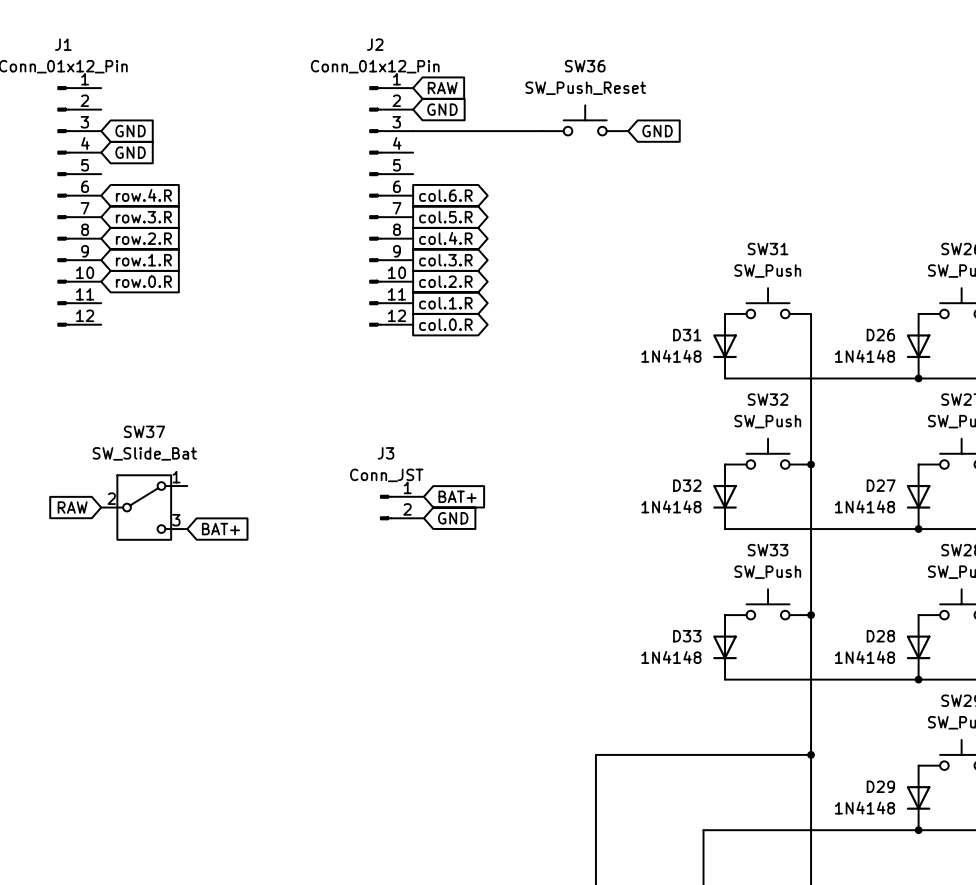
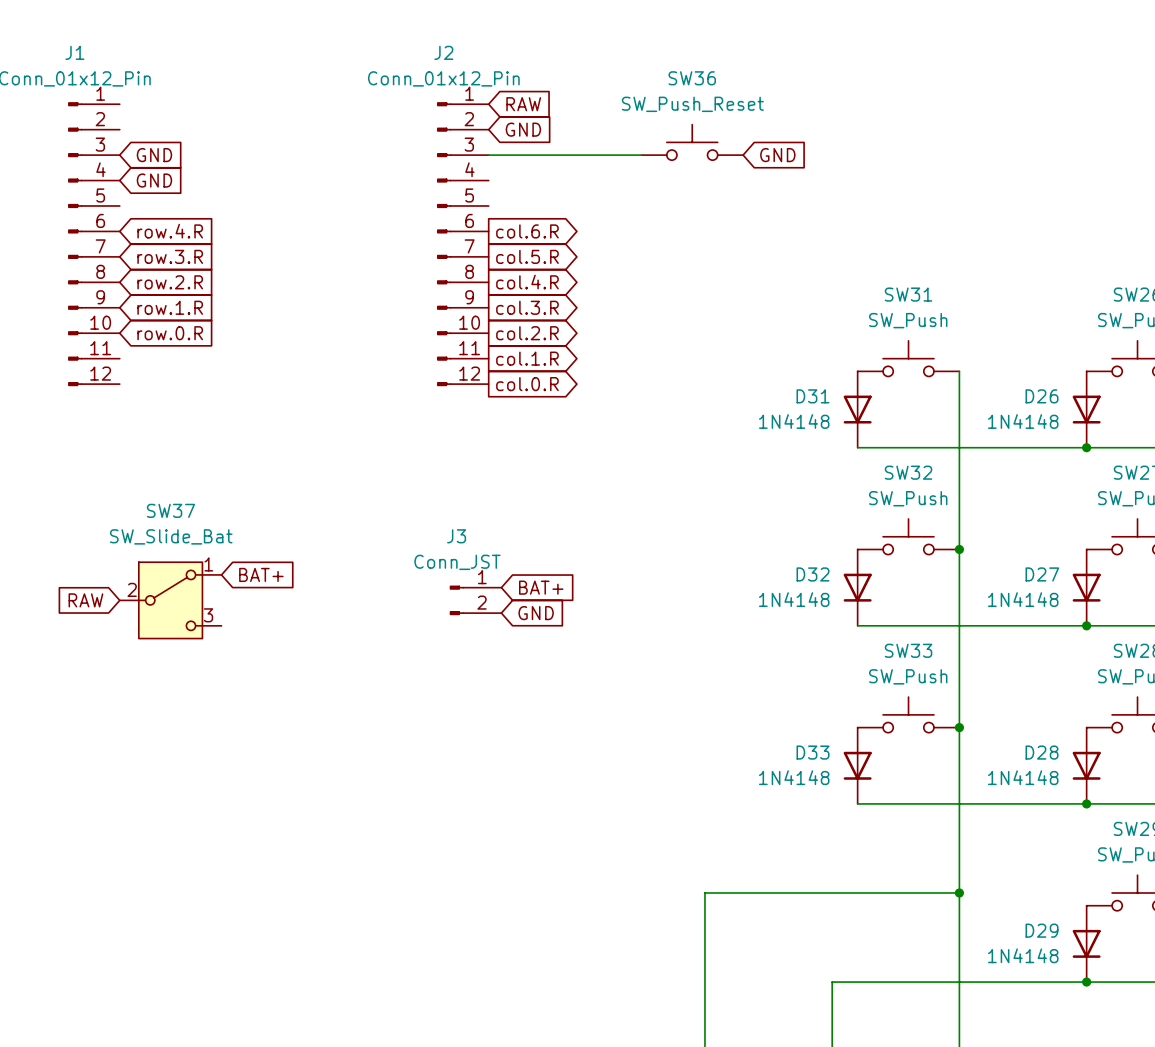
global label position: BAT+ (220, 529) -> BAT+ (261, 574)

